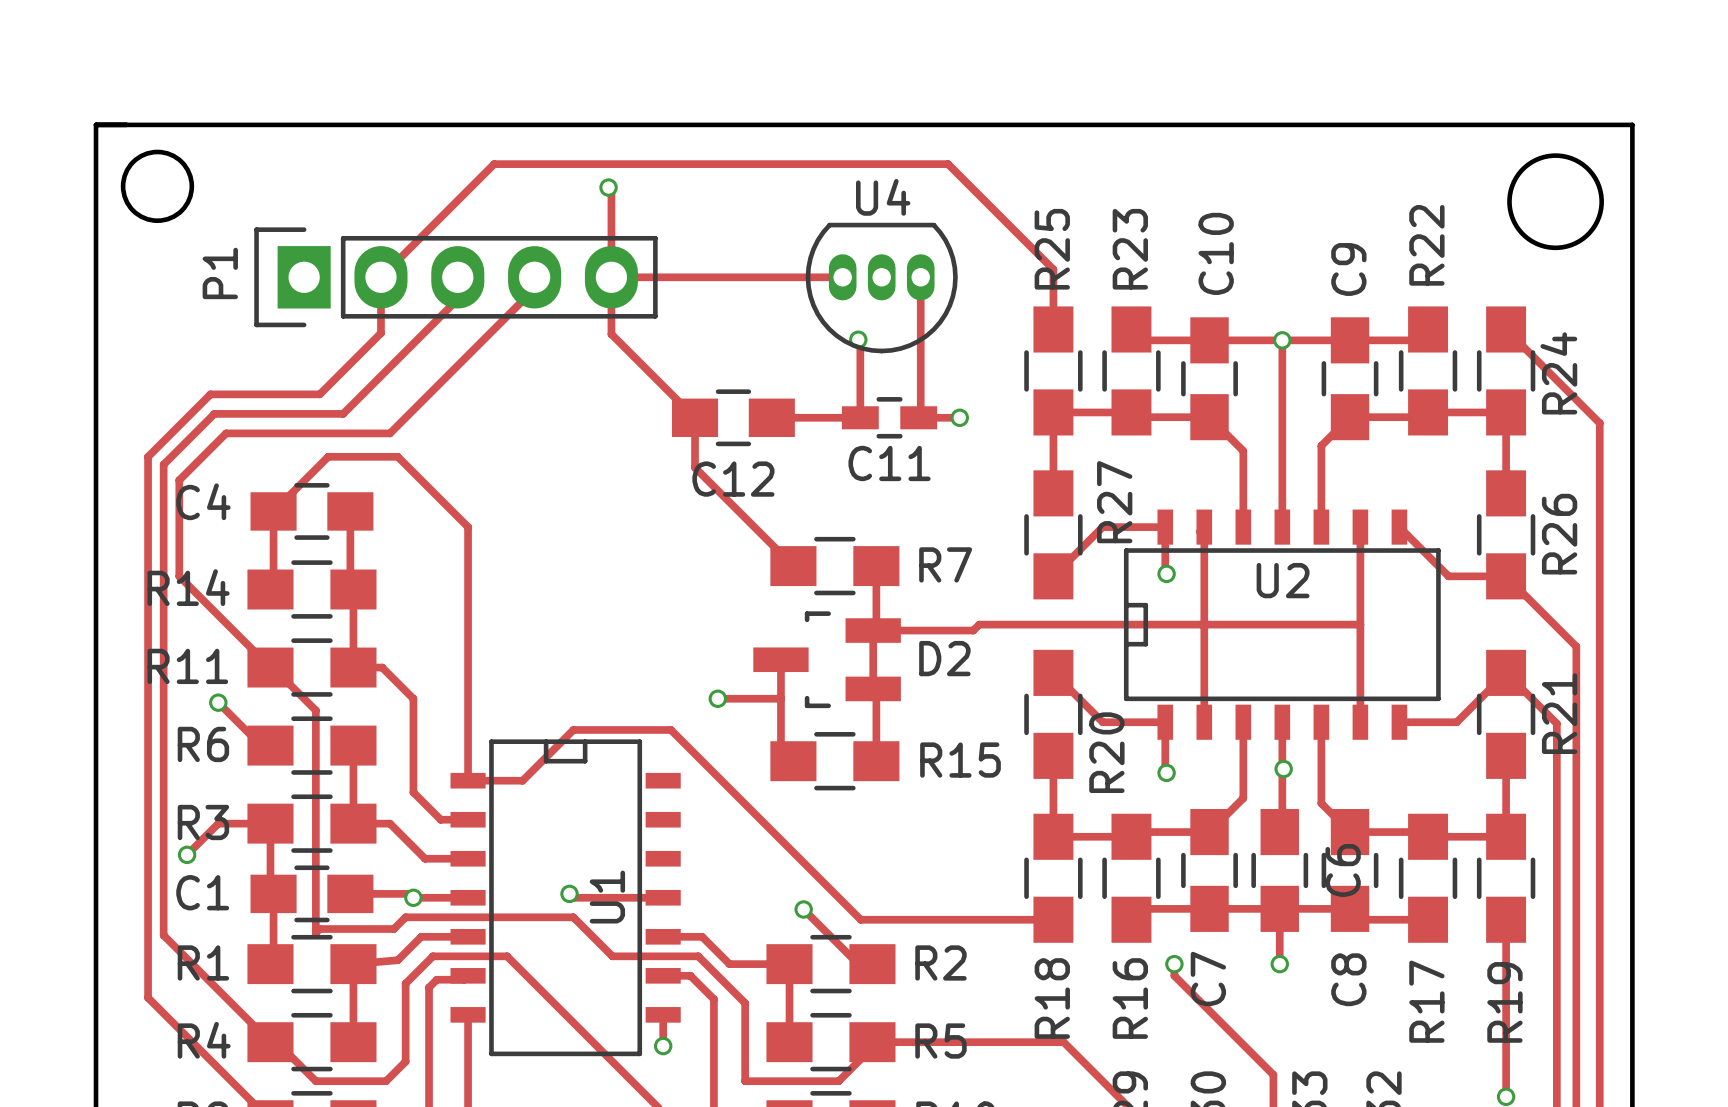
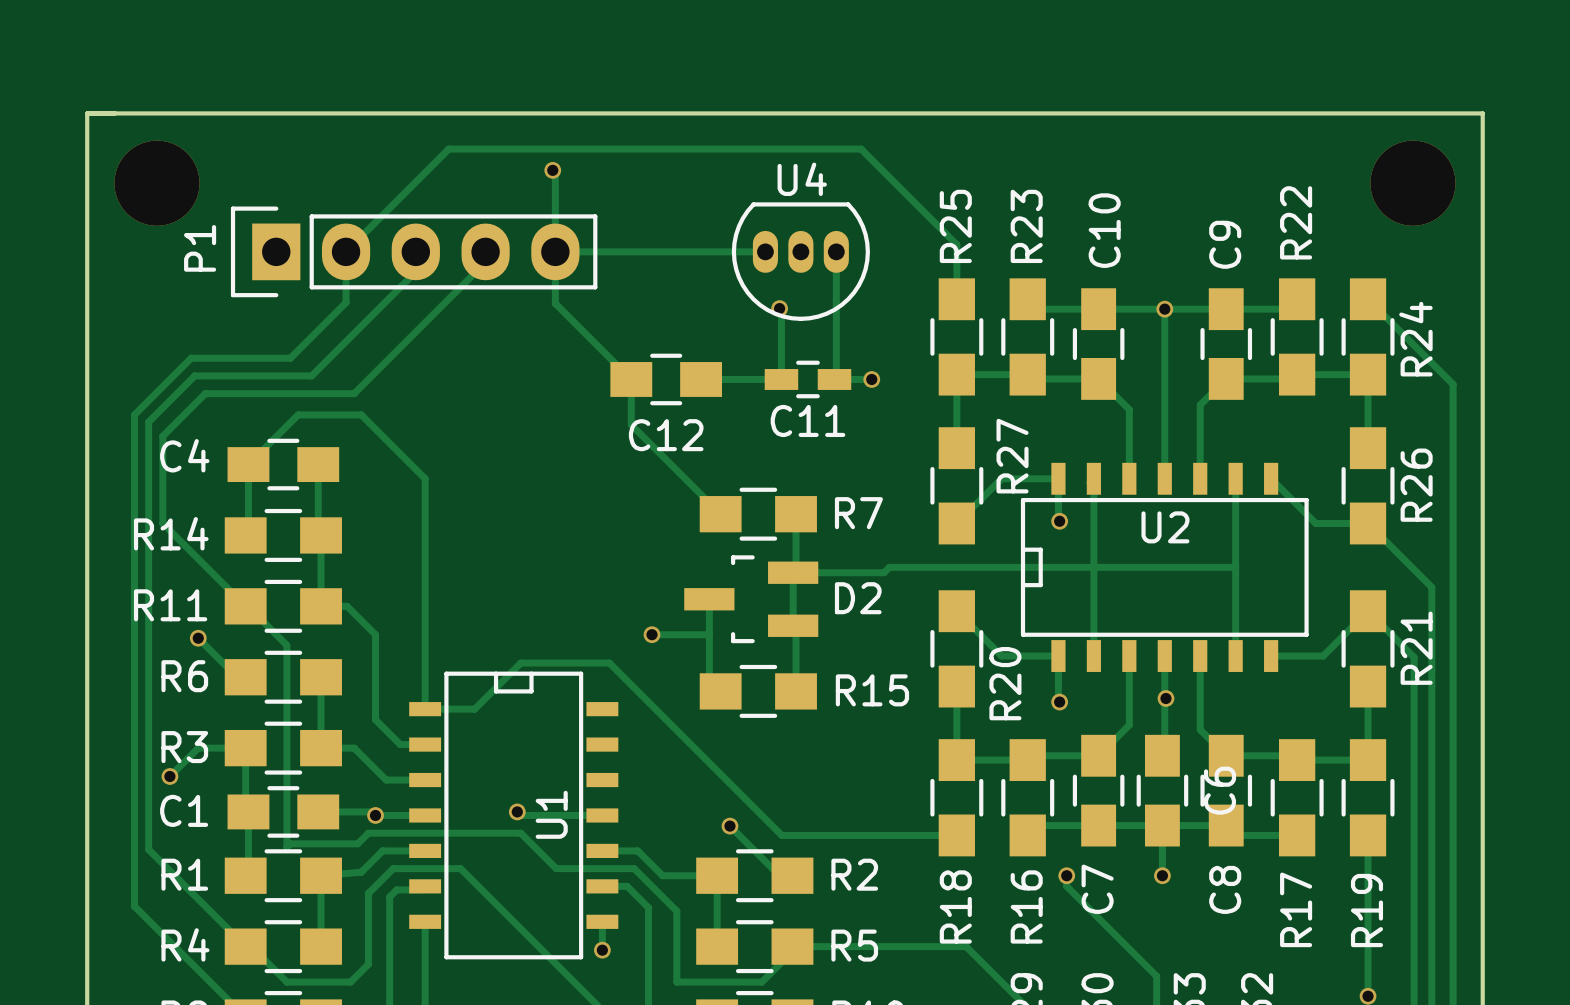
round board edge: [120, 149, 195, 224] -> none
round board edge: [1507, 153, 1604, 251] -> none
part: none -> (156, 183)
part: none -> (1412, 183)

